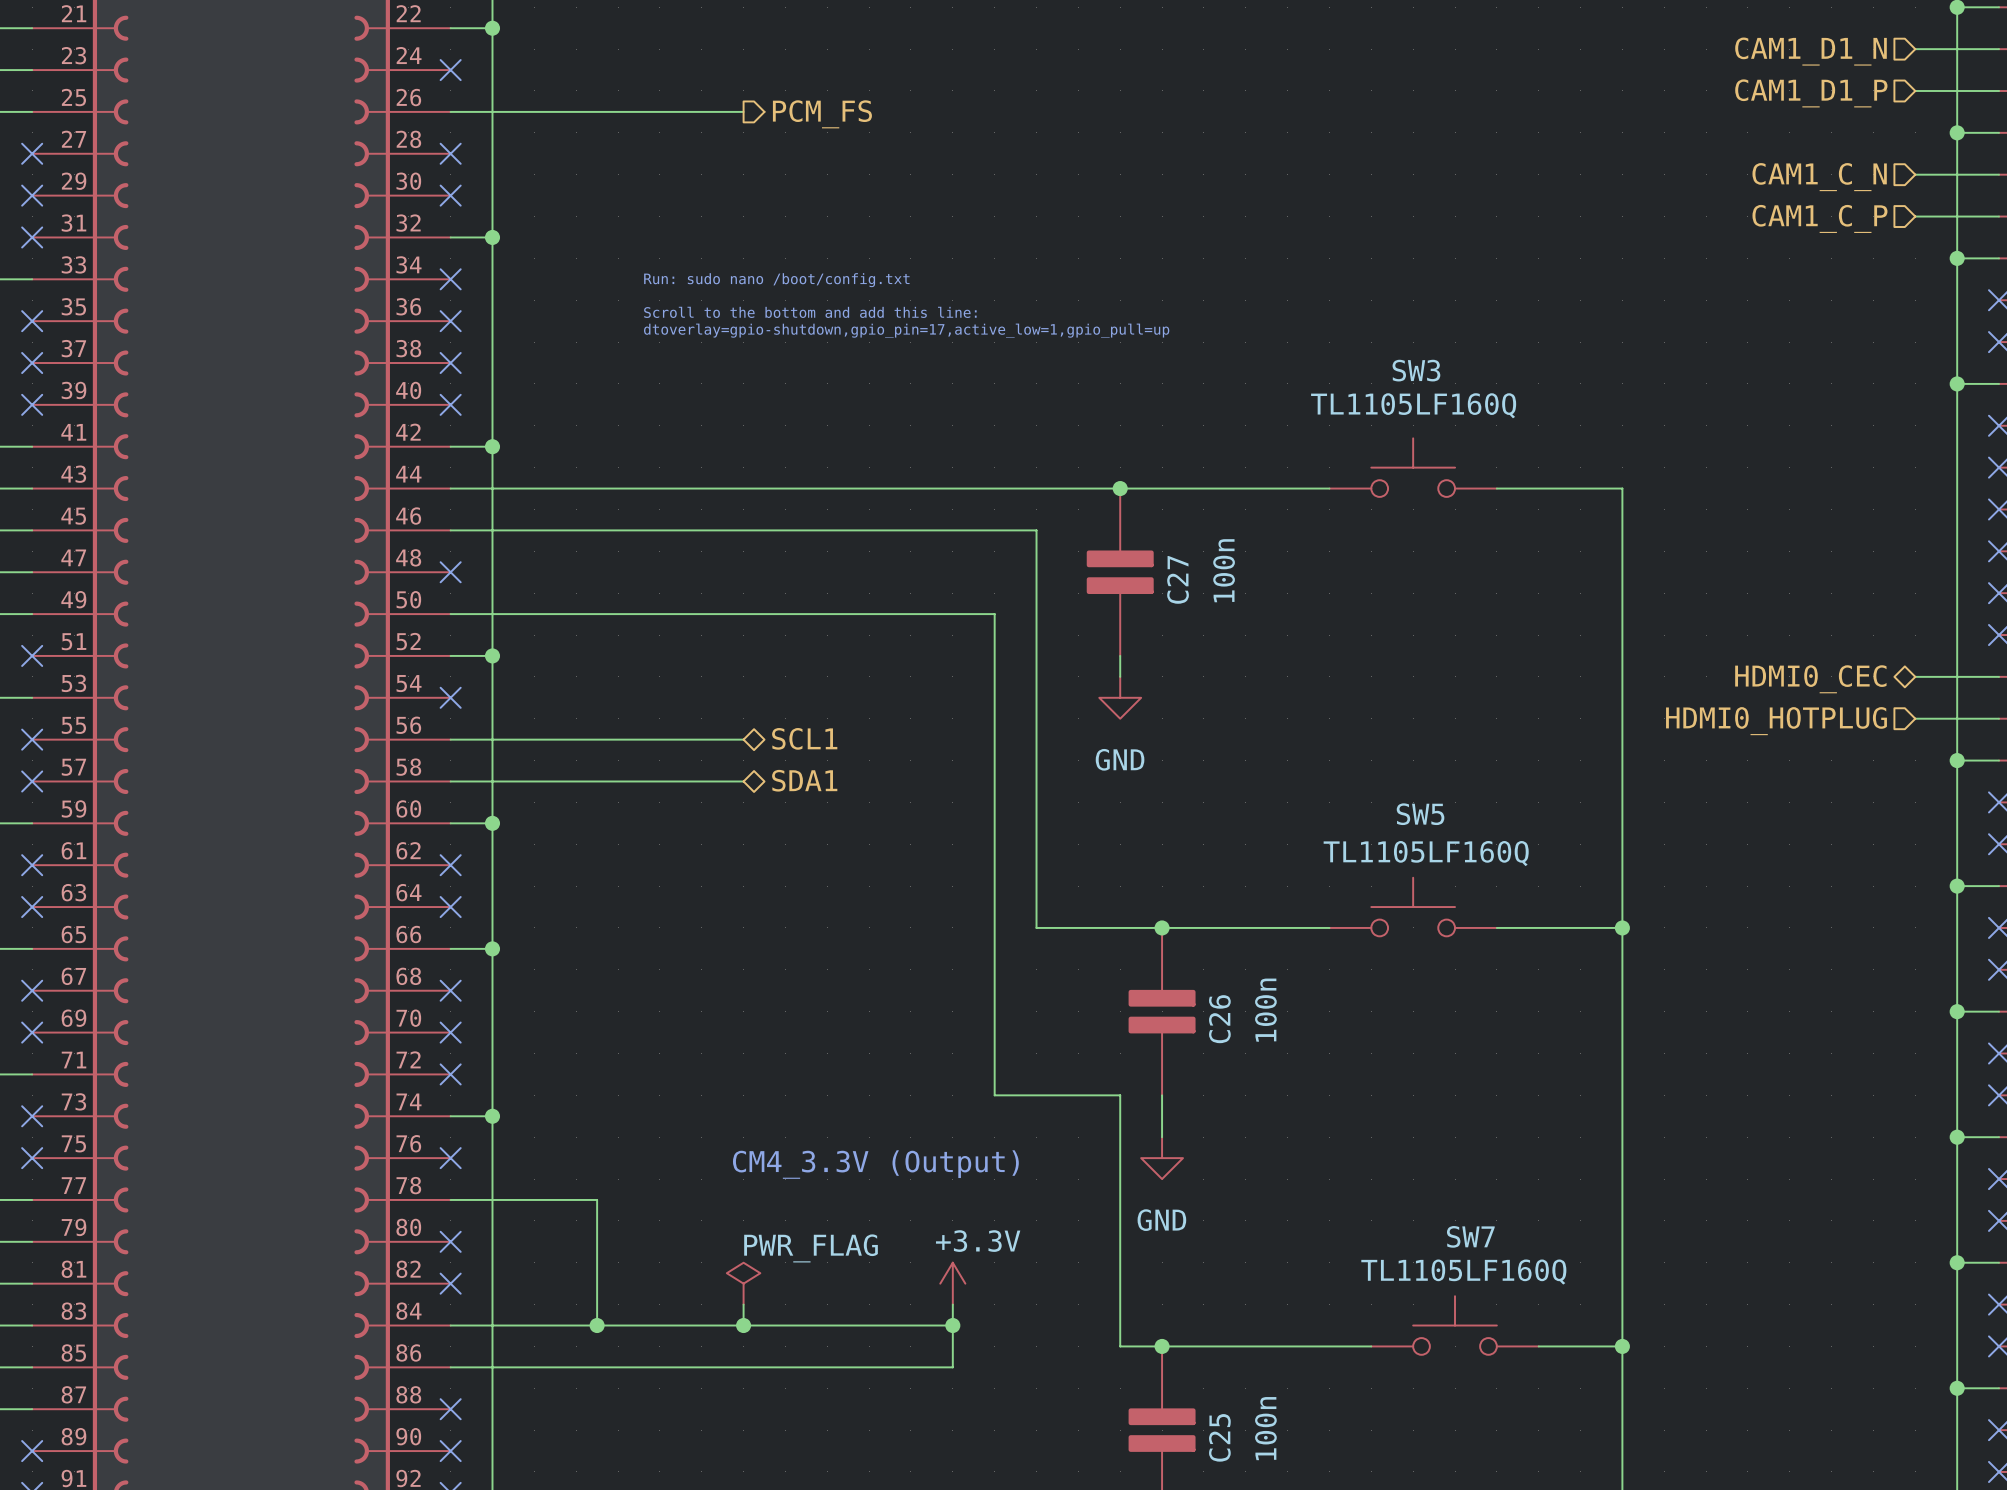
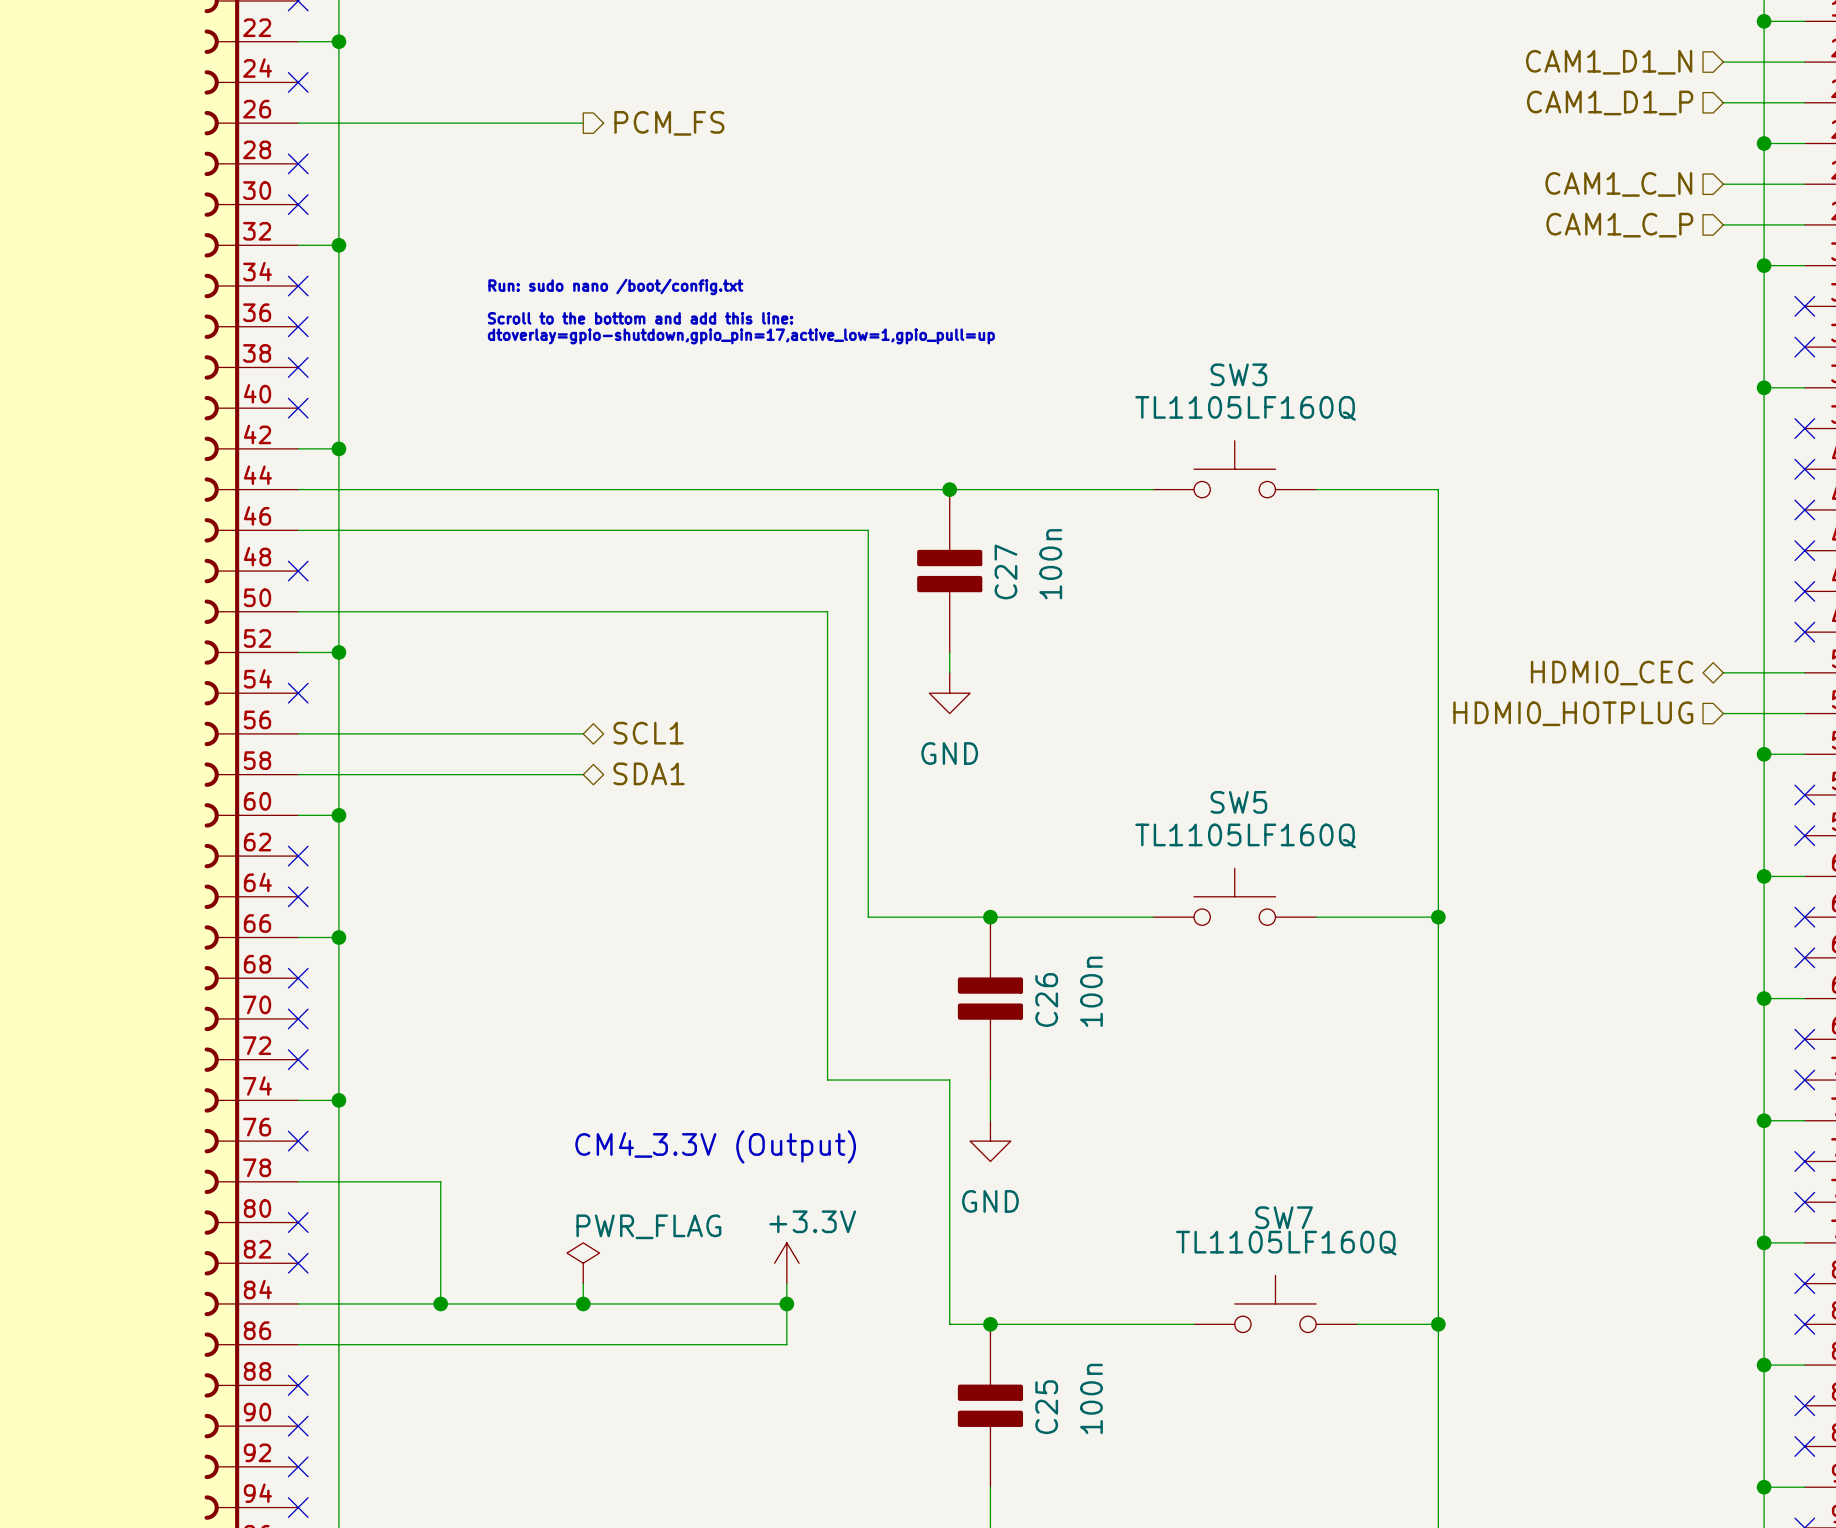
SW3 name position: SW3 (1416, 370) -> SW3 (1238, 374)
SW3 value position: TL1105LF160Q (1413, 405) -> TL1105LF160Q (1245, 408)
SW5 name position: SW5 (1420, 814) -> SW5 (1238, 802)
SW5 value position: TL1105LF160Q (1426, 853) -> TL1105LF160Q (1245, 835)
SW7 value position: TL1105LF160Q (1463, 1272) -> TL1105LF160Q (1286, 1243)

